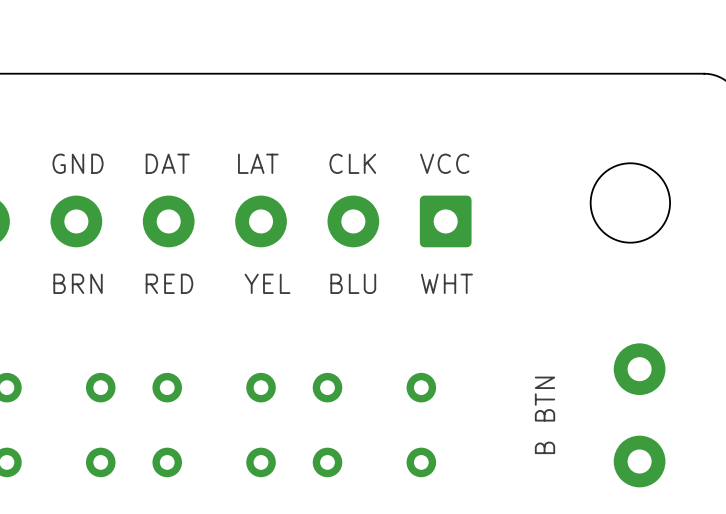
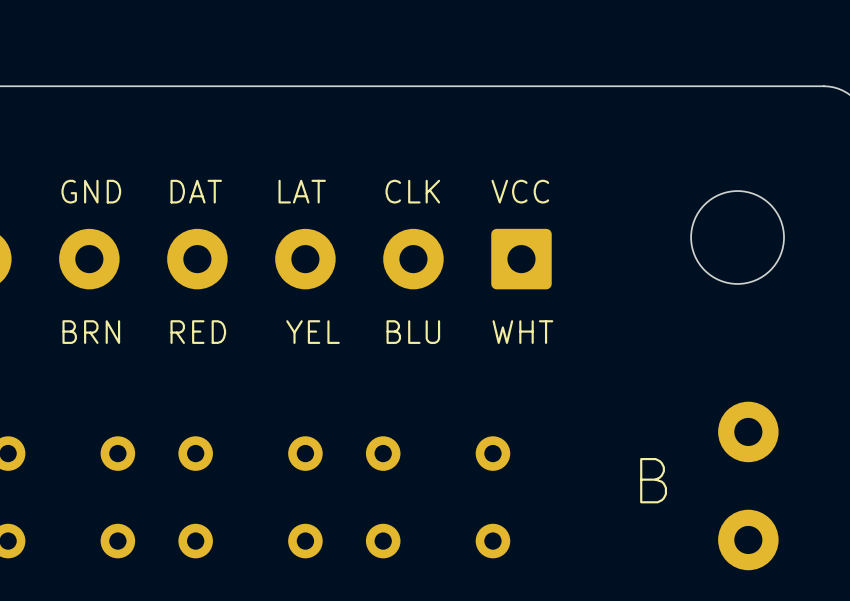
text: none -> B (653, 480)
text: B BTN (545, 415) -> none

